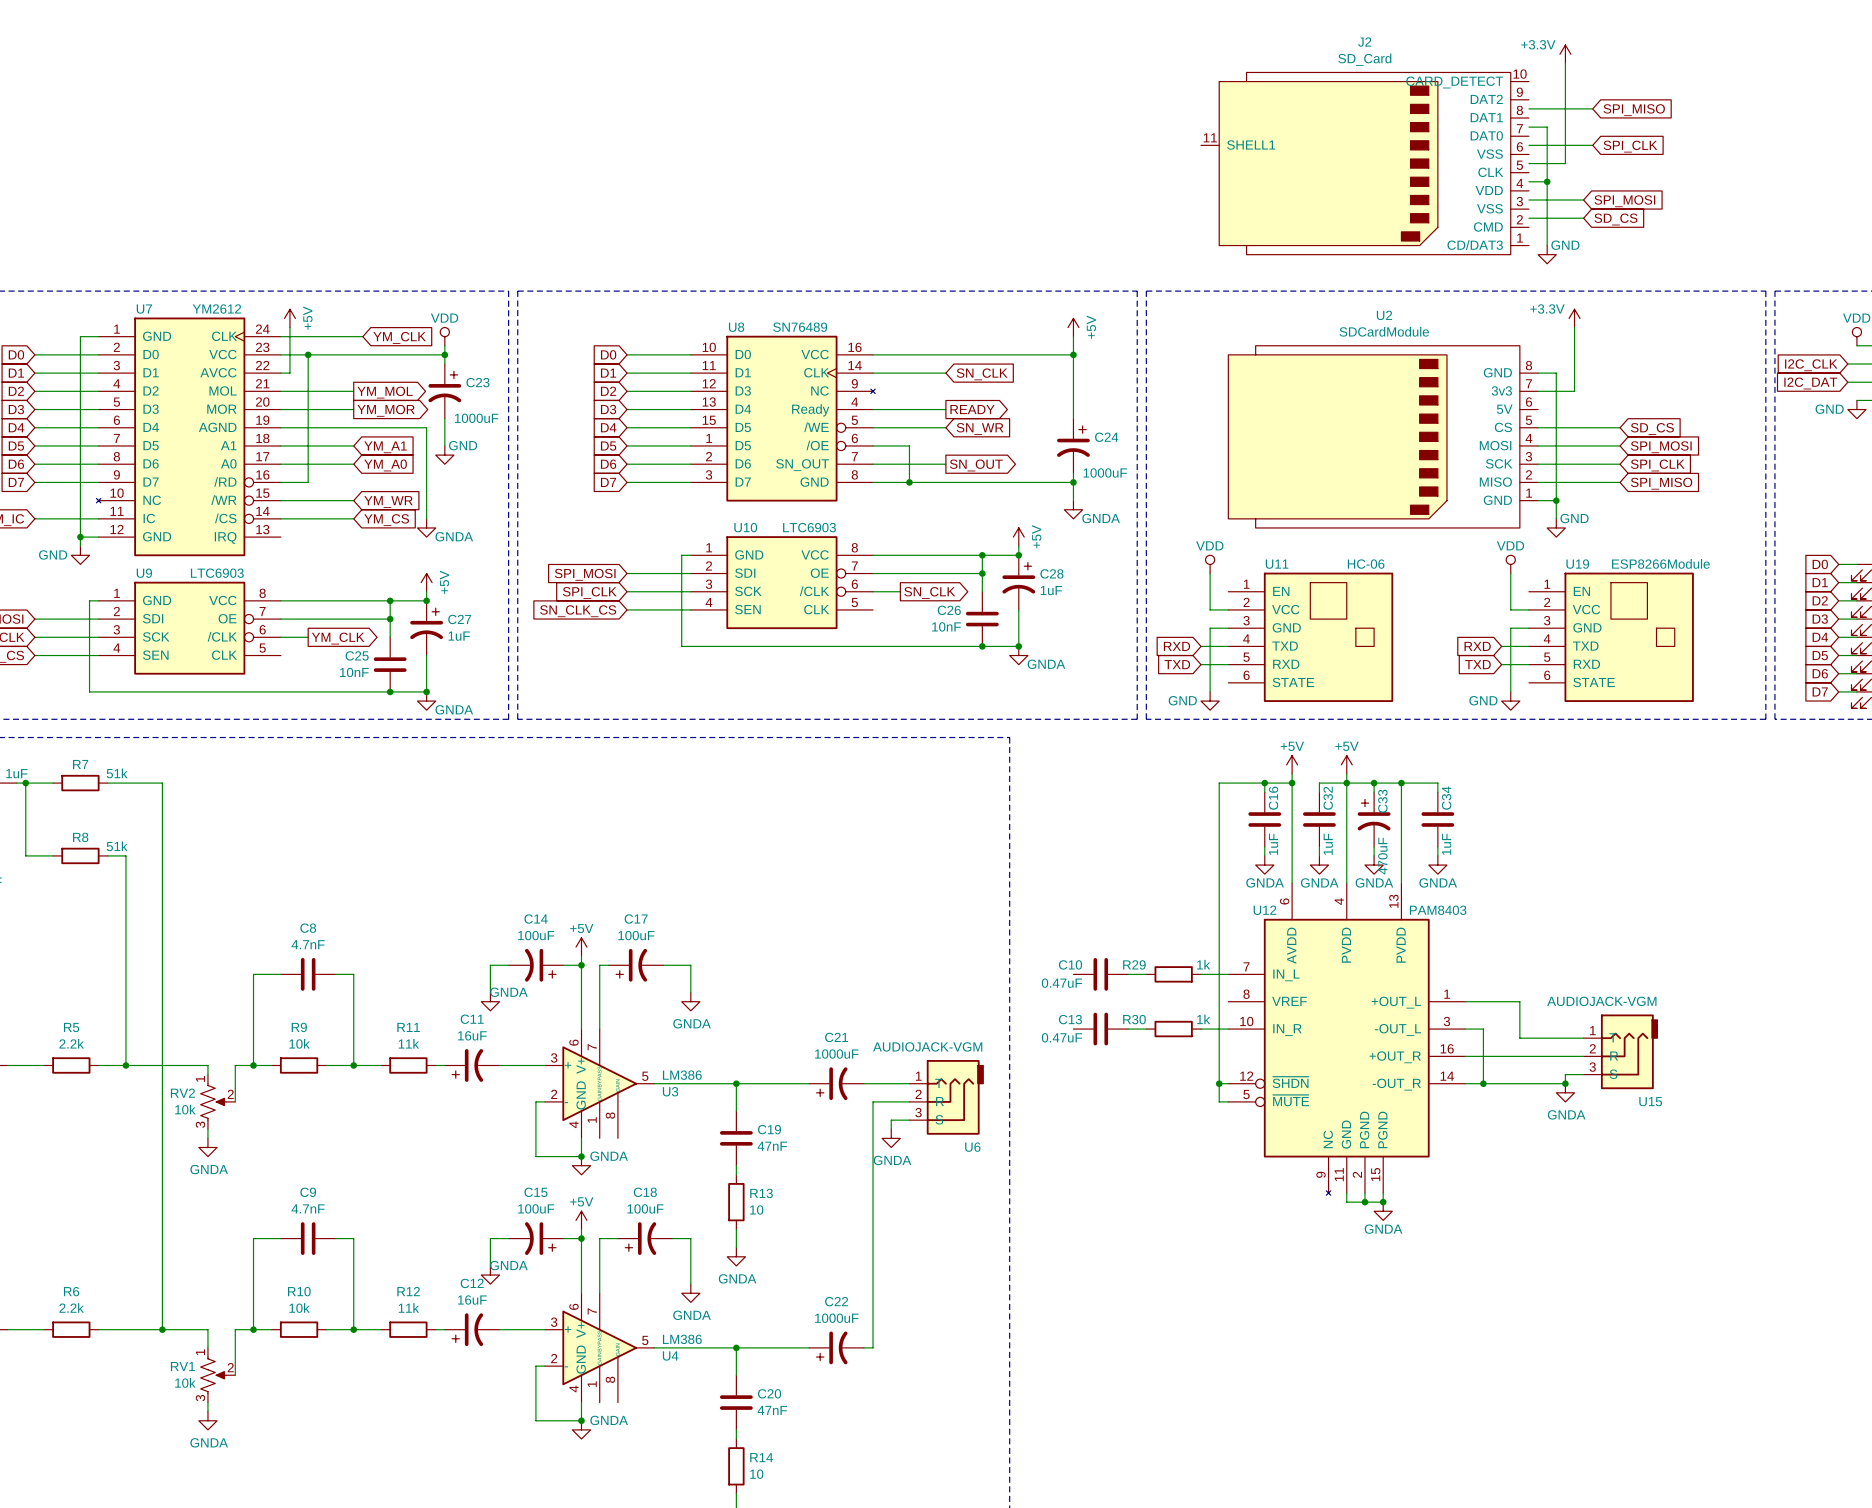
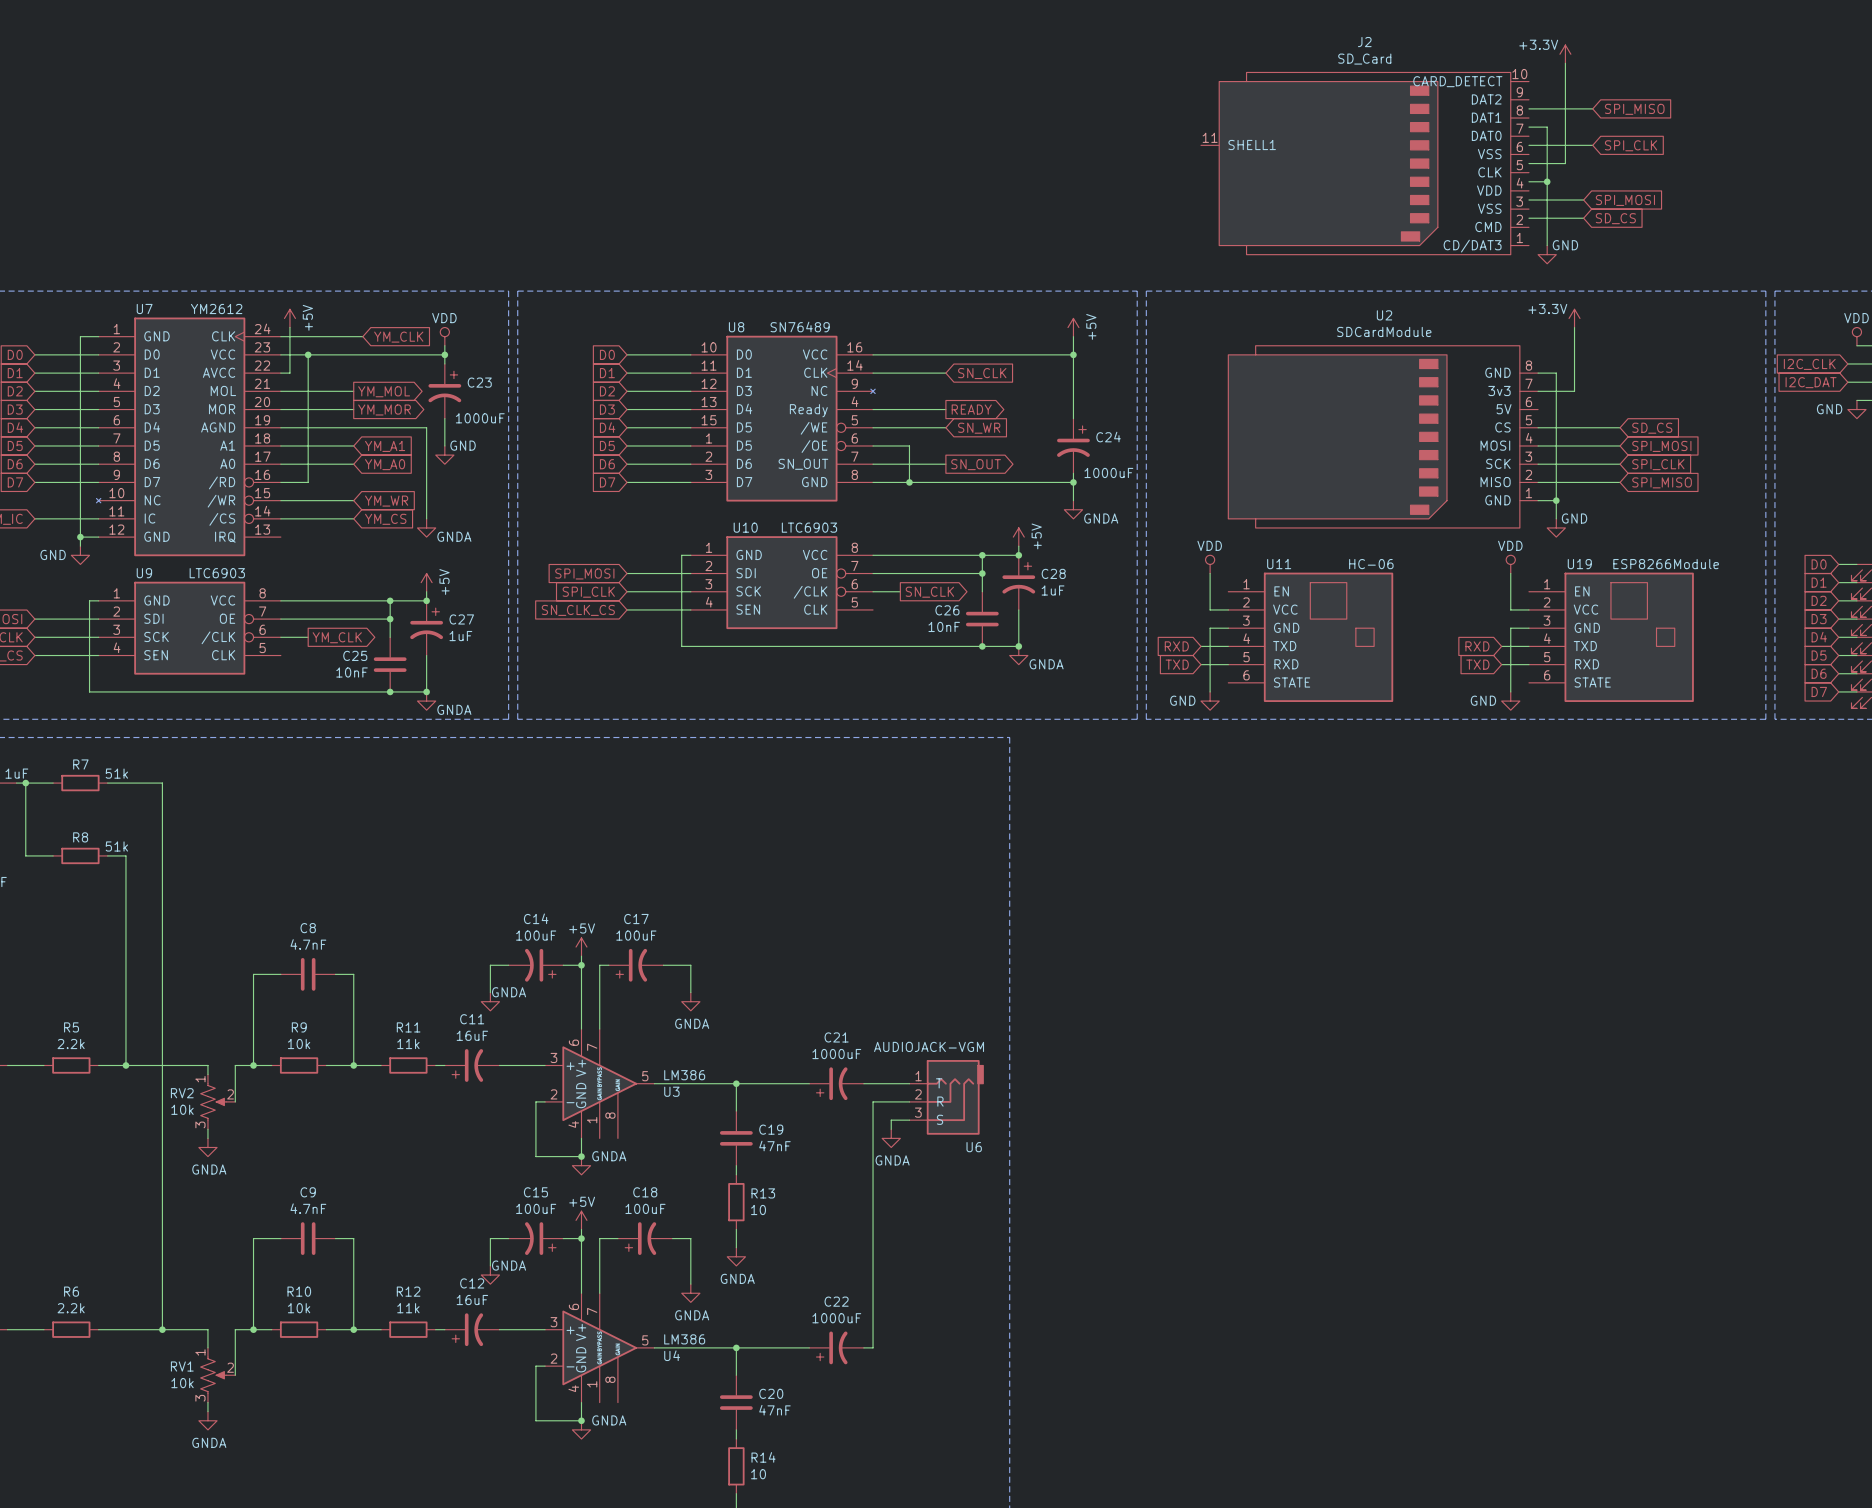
power symbol: +5V (1292, 764) -> none
power symbol: +5V (1346, 764) -> none
wire: (1292, 773) (1292, 883) -> none
wire: (1346, 773) (1346, 883) -> none
wire: (1264, 783) (1264, 792) -> none
junction: (1264, 783) -> none
wire: (1292, 783) (1219, 783) (1219, 1101) (1228, 1101) -> none
junction: (1292, 783) -> none
junction: (1346, 783) -> none
wire: (1374, 783) (1374, 792) -> none
junction: (1374, 783) -> none
wire: (1401, 783) (1401, 883) -> none
junction: (1401, 783) -> none
wire: (1319, 792) (1319, 783) (1437, 783) (1437, 792) -> none
C16: 1uF (1264, 819) -> none
C32: 1uF (1319, 819) -> none
C33: 470uF (1374, 819) -> none
C34: 1uF (1437, 819) -> none
wire: (1264, 846) (1264, 855) -> none
wire: (1319, 846) (1319, 855) -> none
wire: (1374, 846) (1374, 855) -> none
wire: (1437, 846) (1437, 855) -> none
power symbol: GNDA (1264, 865) -> none
power symbol: GNDA (1319, 865) -> none
power symbol: GNDA (1374, 865) -> none
power symbol: GNDA (1437, 865) -> none
C10: 0.47uF (1100, 974) -> none
wire: (1128, 974) (1146, 974) -> none
R29: 1k (1173, 974) -> none
wire: (1200, 974) (1228, 974) -> none
wire: (1465, 1001) (1519, 1001) (1519, 1038) (1583, 1038) -> none
C13: 0.47uF (1100, 1029) -> none
wire: (1128, 1029) (1146, 1029) -> none
R30: 1k (1173, 1029) -> none
wire: (1200, 1029) (1228, 1029) -> none
wire: (1465, 1029) (1483, 1029) (1483, 1083) -> none
U12: PAM8403 (1346, 1039) -> none
U15: AUDIOJACK-VGM (1620, 1051) -> none
wire: (1465, 1056) (1583, 1056) -> none
wire: (1583, 1074) (1565, 1074) (1565, 1083) (1465, 1083) -> none
wire: (1219, 1083) (1228, 1083) -> none
junction: (1219, 1083) -> none
junction: (1483, 1083) -> none
junction: (1565, 1083) -> none
power symbol: GNDA (1565, 1092) -> none
wire: (1346, 1193) (1346, 1202) (1383, 1202) (1383, 1193) -> none
wire: (1364, 1193) (1364, 1202) -> none
junction: (1364, 1202) -> none
junction: (1383, 1202) -> none
power symbol: GNDA (1383, 1211) -> none

